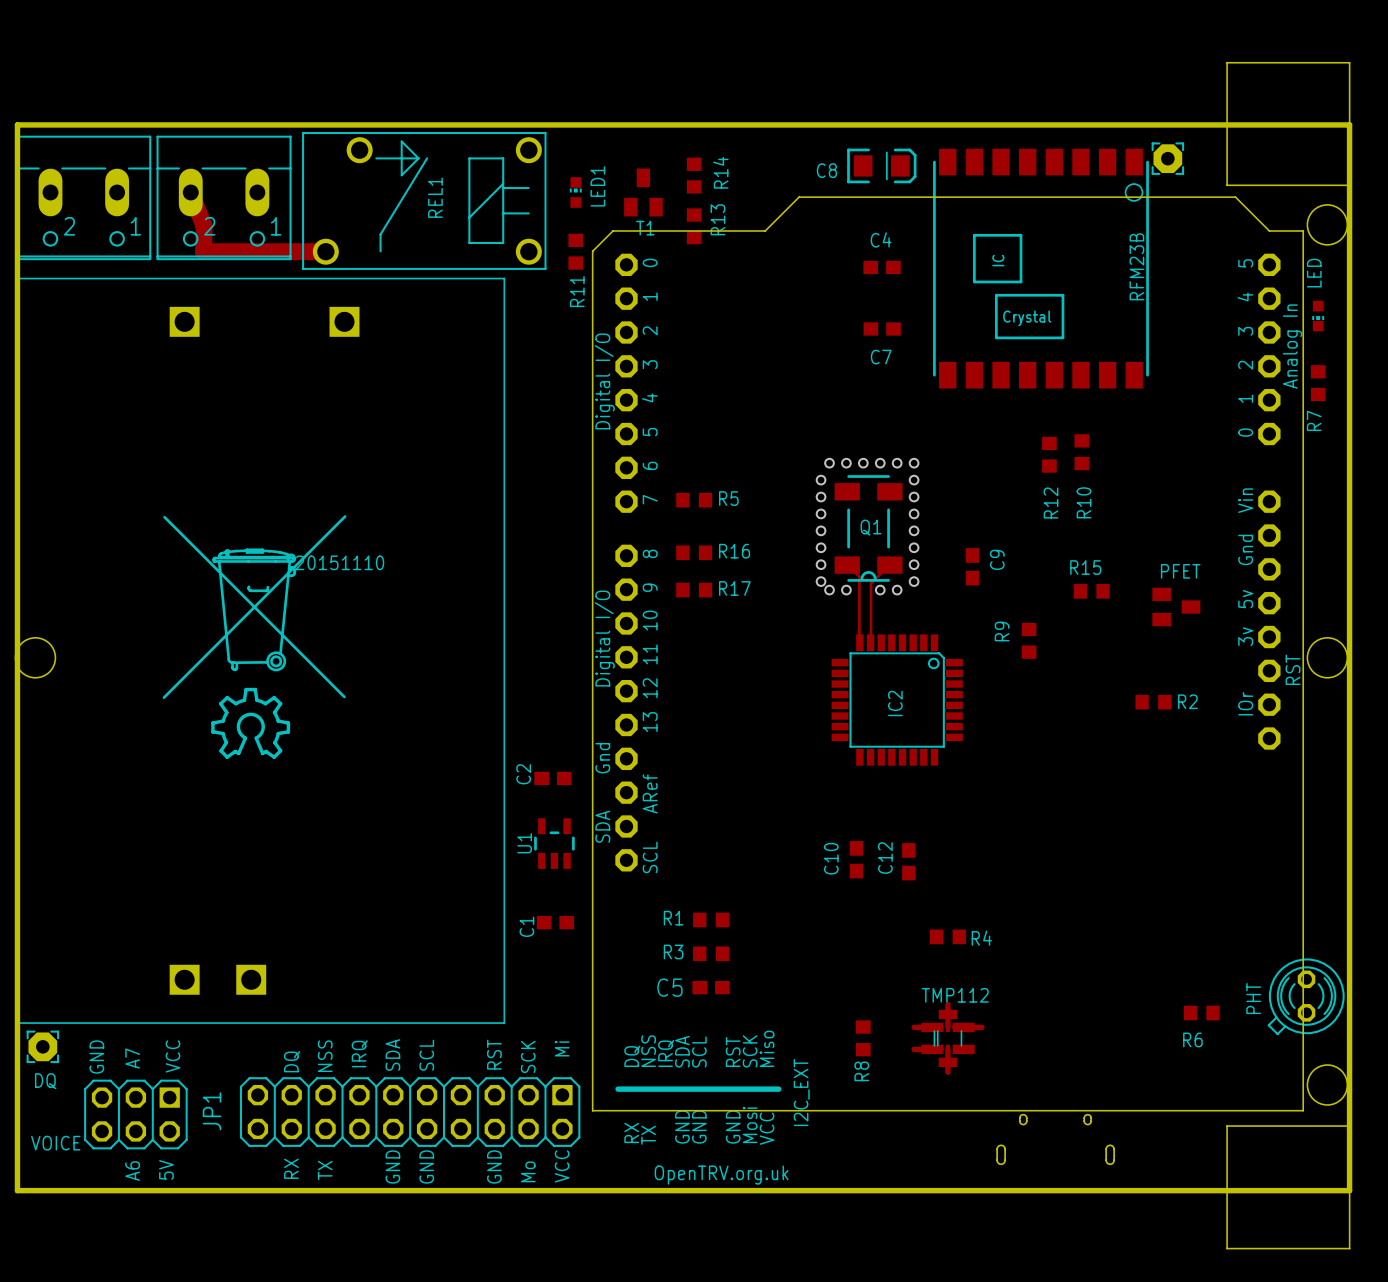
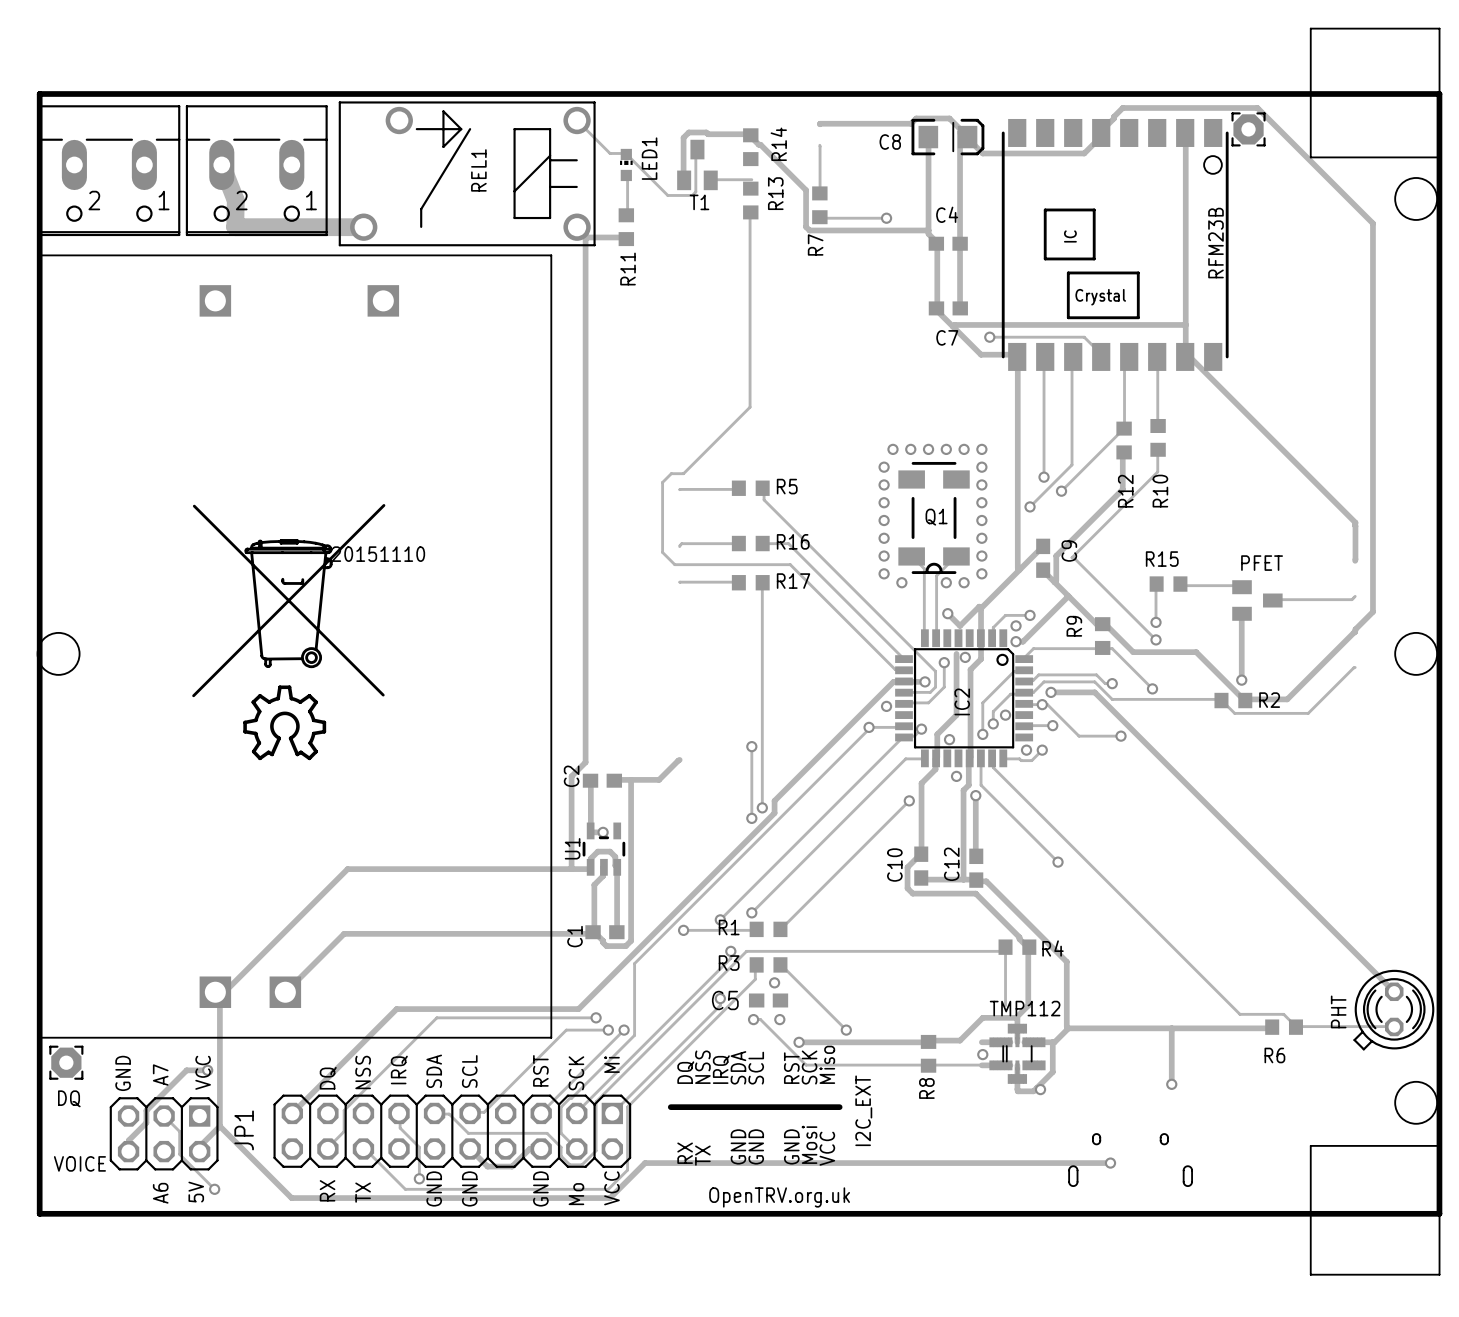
track: none -> (577, 120) (610, 153) (625, 153) (667, 195) (692, 195) (695, 191) (695, 149) (697, 149)
track: none -> (819, 124) (911, 123) (916, 118) (949, 118) (967, 137)
track: none -> (1185, 132) (1185, 356) (1191, 358) (1355, 522) (1355, 560)
track: none -> (928, 137) (928, 233) (937, 244) (937, 310) (981, 354) (1016, 354) (1017, 356)
track: none -> (967, 137) (982, 153) (1084, 153) (1100, 137) (1101, 130) (1122, 107) (1257, 107) (1372, 223) (1372, 611) (1355, 631) (1287, 699) (1245, 700) (1196, 652) (1133, 652) (1105, 624) (1096, 624) (1043, 570)
track: none -> (967, 137) (960, 132) (960, 308)
track: none -> (819, 145) (819, 193)
track: none -> (626, 175) (626, 215)
track: none -> (751, 179) (710, 180)
track: none -> (684, 180) (683, 137) (688, 132) (750, 134) (806, 190) (806, 226) (809, 230) (928, 230)
track: none -> (750, 212) (750, 407) (683, 473) (671, 473) (662, 482) (662, 552) (674, 564) (790, 564) (895, 669) (904, 670)
track: none -> (819, 217) (886, 218)
via: none -> (886, 218)
track: none -> (587, 237) (625, 237) (626, 239)
track: none -> (587, 237) (585, 239) (585, 762) (571, 776) (571, 869)
LED: (1318, 316) -> none
track: none -> (1185, 324) (954, 324) (953, 326)
track: none -> (989, 337) (1084, 337) (1100, 352) (1101, 356)
via: none -> (989, 337)
track: none -> (1017, 356) (1017, 568) (1019, 569)
track: none -> (1045, 356) (1044, 477)
track: none -> (1073, 356) (1072, 464) (1030, 506)
track: none -> (1129, 356) (1124, 361) (1124, 428) (1061, 491)
track: none -> (1157, 356) (1158, 425)
R7 position: (1318, 383) -> (819, 205)
track: none -> (1158, 449) (1157, 471) (1072, 557) (1156, 639)
track: none -> (1124, 452) (1122, 489) (1056, 555) (1056, 580) (1054, 582)
via: none -> (1044, 477)
track: none -> (738, 488) (679, 489)
track: none -> (762, 488) (764, 499) (935, 671) (935, 687) (930, 692) (904, 692)
via: none -> (1061, 491)
via: none -> (1030, 506)
track: none -> (738, 543) (681, 543) (679, 546)
track: none -> (762, 543) (788, 543) (904, 659)
track: none -> (1043, 546) (981, 608)
track: none -> (679, 582) (738, 582)
track: none -> (762, 582) (762, 807)
via: (829, 590) -> none
via: none -> (901, 582)
via: (846, 590) -> none
track: none -> (1156, 584) (1156, 622)
track: none -> (1180, 584) (1180, 585) (1241, 585) (1242, 587)
track: none -> (1068, 596) (1023, 641) (1016, 641)
track: none -> (1355, 596) (1351, 599) (1272, 600)
track: none -> (981, 608) (981, 638)
track: none -> (981, 608) (979, 606) (960, 625) (947, 613)
via: none -> (947, 613)
track: none -> (1242, 613) (1241, 680)
track: none -> (1030, 615) (1005, 615) (993, 627) (992, 638)
via: none -> (1030, 615)
via: none -> (1156, 622)
via: none -> (1016, 625)
track: none -> (980, 638) (981, 659) (970, 669) (970, 757) (968, 758) (968, 785) (963, 790) (963, 879)
via: none -> (1156, 639)
via: none -> (1016, 641)
part: (947, 653) -> none
track: none -> (956, 653) (956, 715) (937, 734) (935, 769) (921, 783) (921, 853) (907, 867) (907, 888) (912, 893) (975, 893) (1029, 947) (1028, 1005) (1016, 1017) (982, 1017) (960, 1040) (799, 1042)
via: none -> (965, 657)
track: none -> (1024, 659) (1033, 648) (1112, 648) (1152, 688)
track: none -> (944, 662) (944, 687) (928, 702) (904, 703)
via: none -> (944, 662)
track: none -> (1355, 667) (1308, 713) (1234, 713) (1220, 699) (1112, 699) (1094, 681) (1044, 681) (1033, 692) (1010, 694) (993, 711) (993, 723)
track: none -> (1024, 670) (1014, 671) (982, 702) (982, 734)
via: none -> (1241, 680)
track: none -> (925, 681) (893, 681) (774, 800) (774, 813) (578, 1009) (396, 1009) (292, 1113)
via: none -> (925, 681)
track: none -> (1024, 681) (1033, 680) (1038, 674) (1096, 674) (1105, 683) (1112, 683)
via: none -> (1112, 683)
via: none -> (1152, 688)
track: none -> (1051, 692) (1094, 692) (1394, 991)
via: none -> (1051, 692)
track: none -> (1024, 703) (1047, 704) (1079, 736) (1121, 736)
via: none -> (1042, 704)
via: none -> (886, 706)
via: none -> (1005, 715)
via: none -> (993, 723)
track: none -> (904, 726) (870, 727) (634, 963) (634, 1035) (561, 1107) (561, 1133) (576, 1149)
track: none -> (1052, 725) (1024, 726)
via: none -> (1052, 725)
via: none -> (869, 727)
track: none -> (921, 729) (914, 736) (904, 736) (720, 919)
via: none -> (921, 729)
via: none -> (982, 734)
via: none -> (1121, 736)
via: none -> (949, 739)
track: none -> (751, 746) (751, 818)
via: none -> (751, 746)
via: none -> (1026, 750)
track: none -> (1042, 750) (1031, 760) (1003, 758)
via: none -> (1042, 750)
track: none -> (924, 758) (905, 758) (751, 912)
track: none -> (980, 758) (981, 785) (1058, 862)
track: none -> (992, 758) (993, 767) (1239, 1014) (1283, 1014) (1295, 1026)
track: none -> (679, 759) (659, 779) (614, 780)
via: none -> (956, 776)
track: none -> (631, 779) (631, 940) (625, 946) (606, 946) (593, 932)
track: none -> (590, 780) (590, 830) (603, 832)
track: none -> (975, 795) (976, 856)
via: none -> (975, 795)
track: none -> (909, 800) (780, 929)
via: none -> (909, 800)
via: none -> (762, 807)
via: none -> (751, 818)
via: none -> (603, 832)
via: none -> (1058, 862)
track: none -> (603, 867) (603, 876) (594, 884) (593, 932)
track: none -> (617, 867) (617, 932)
track: none -> (617, 867) (615, 865) (615, 856) (610, 851) (597, 851) (590, 858) (589, 869) (347, 869) (221, 995) (215, 992) (219, 996) (219, 1126)
track: none -> (921, 878) (921, 879) (986, 881) (1066, 961) (1066, 1026) (1068, 1028)
via: none -> (751, 912)
via: none -> (720, 919)
track: none -> (756, 929) (683, 930)
via: none -> (683, 930)
track: none -> (593, 932) (590, 933) (344, 933) (285, 992)
track: none -> (1005, 947) (1005, 1005)
track: none -> (730, 951) (730, 958) (576, 1113)
via: none -> (730, 951)
track: none -> (1005, 951) (746, 951) (596, 1101) (596, 1150) (582, 1164) (569, 1164) (561, 1156) (561, 1147) (547, 1133) (468, 1133) (449, 1114) (434, 1113)
track: none -> (756, 964) (755, 979) (627, 1107) (627, 1170) (608, 1189) (405, 1189) (363, 1149)
track: none -> (780, 964) (846, 1030)
via: none -> (774, 982)
track: none -> (720, 998) (720, 1005) (612, 1113)
via: none -> (720, 998)
track: none -> (596, 1017) (436, 1017) (344, 1110) (344, 1131) (327, 1149)
via: none -> (596, 1017)
track: none -> (753, 1019) (760, 1019) (806, 1065) (981, 1065)
via: none -> (753, 1019)
via: none -> (779, 1019)
track: none -> (1295, 1026) (1394, 1026)
track: none -> (1272, 1027) (1068, 1028)
track: none -> (1068, 1028) (1052, 1042)
track: none -> (1171, 1028) (1171, 1084)
track: none -> (608, 1030) (566, 1030) (484, 1112) (470, 1113)
via: none -> (608, 1030)
track: none -> (624, 1030) (541, 1113)
via: none -> (624, 1030)
via: none -> (846, 1030)
via: none -> (799, 1042)
track: none -> (1052, 1042) (1052, 1072) (1033, 1091) (1017, 1091) (1017, 1089)
via: none -> (982, 1054)
track: none -> (207, 1070) (186, 1070) (146, 1110) (146, 1122) (128, 1140) (128, 1151)
via: none -> (207, 1070)
via: none -> (1171, 1084)
via: none -> (1040, 1089)
track: none -> (399, 1113) (400, 1128) (419, 1147) (419, 1178)
track: none -> (164, 1116) (179, 1131) (179, 1154) (214, 1189)
track: none -> (219, 1126) (200, 1145) (199, 1151)
track: none -> (219, 1126) (291, 1198) (610, 1198) (645, 1163) (1110, 1163)
track: none -> (470, 1149) (487, 1166) (512, 1166) (529, 1149) (541, 1149)
via: none -> (1110, 1163)
via: none -> (419, 1178)
via: none -> (214, 1189)

